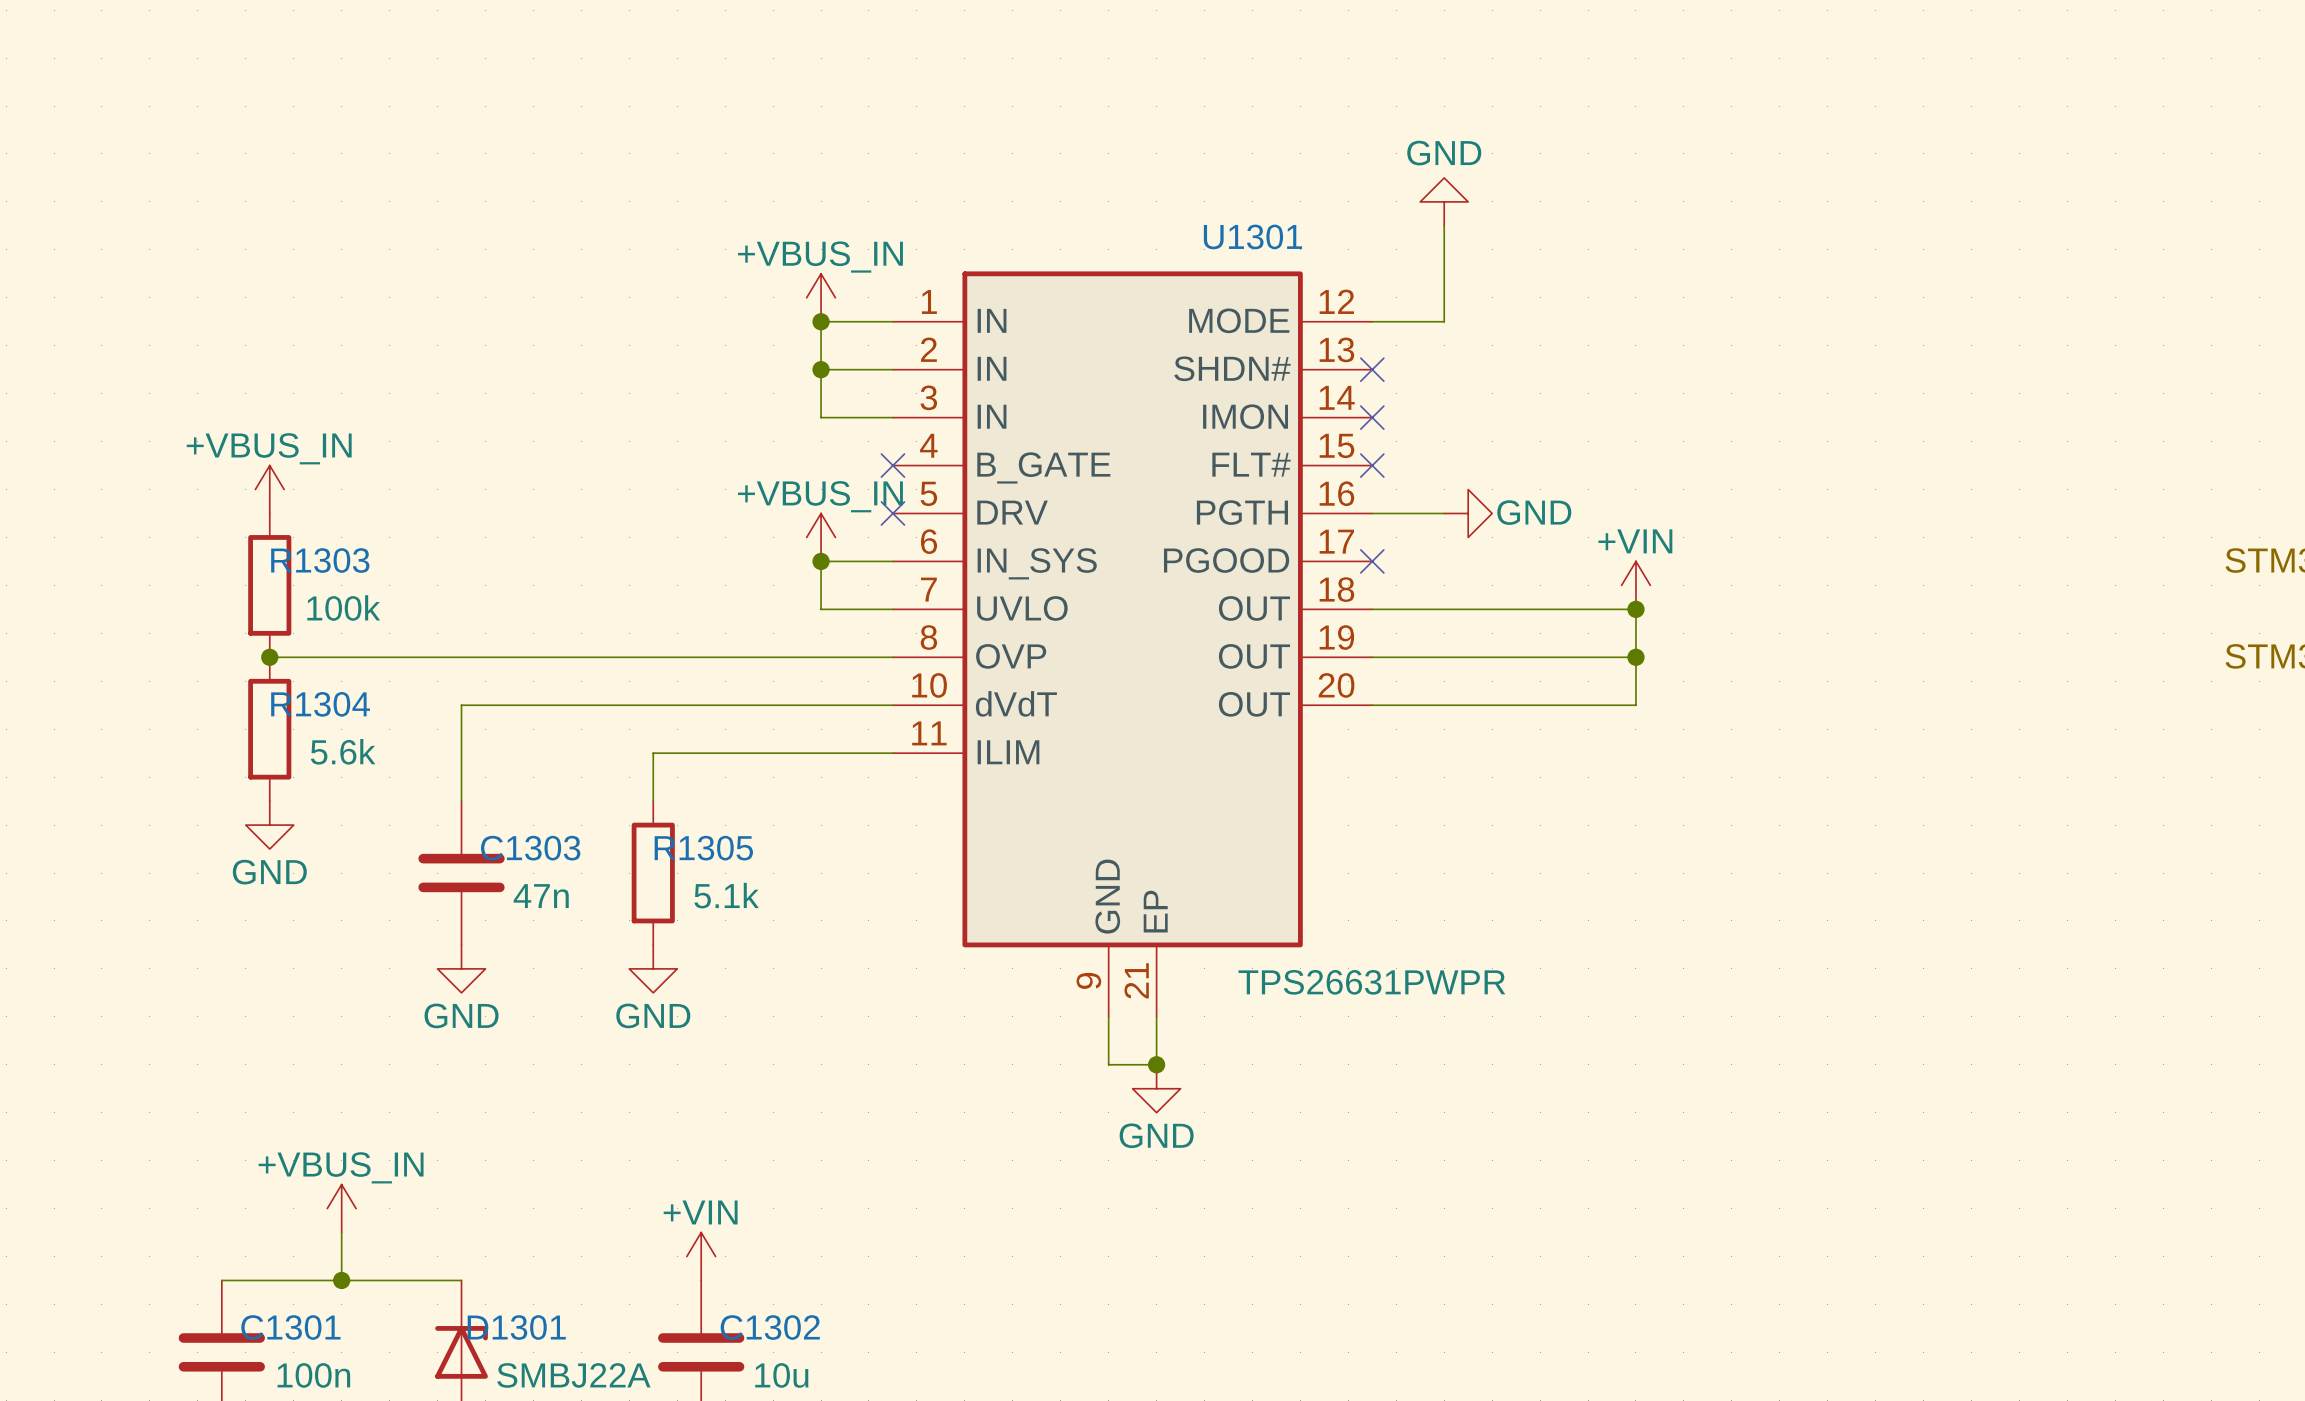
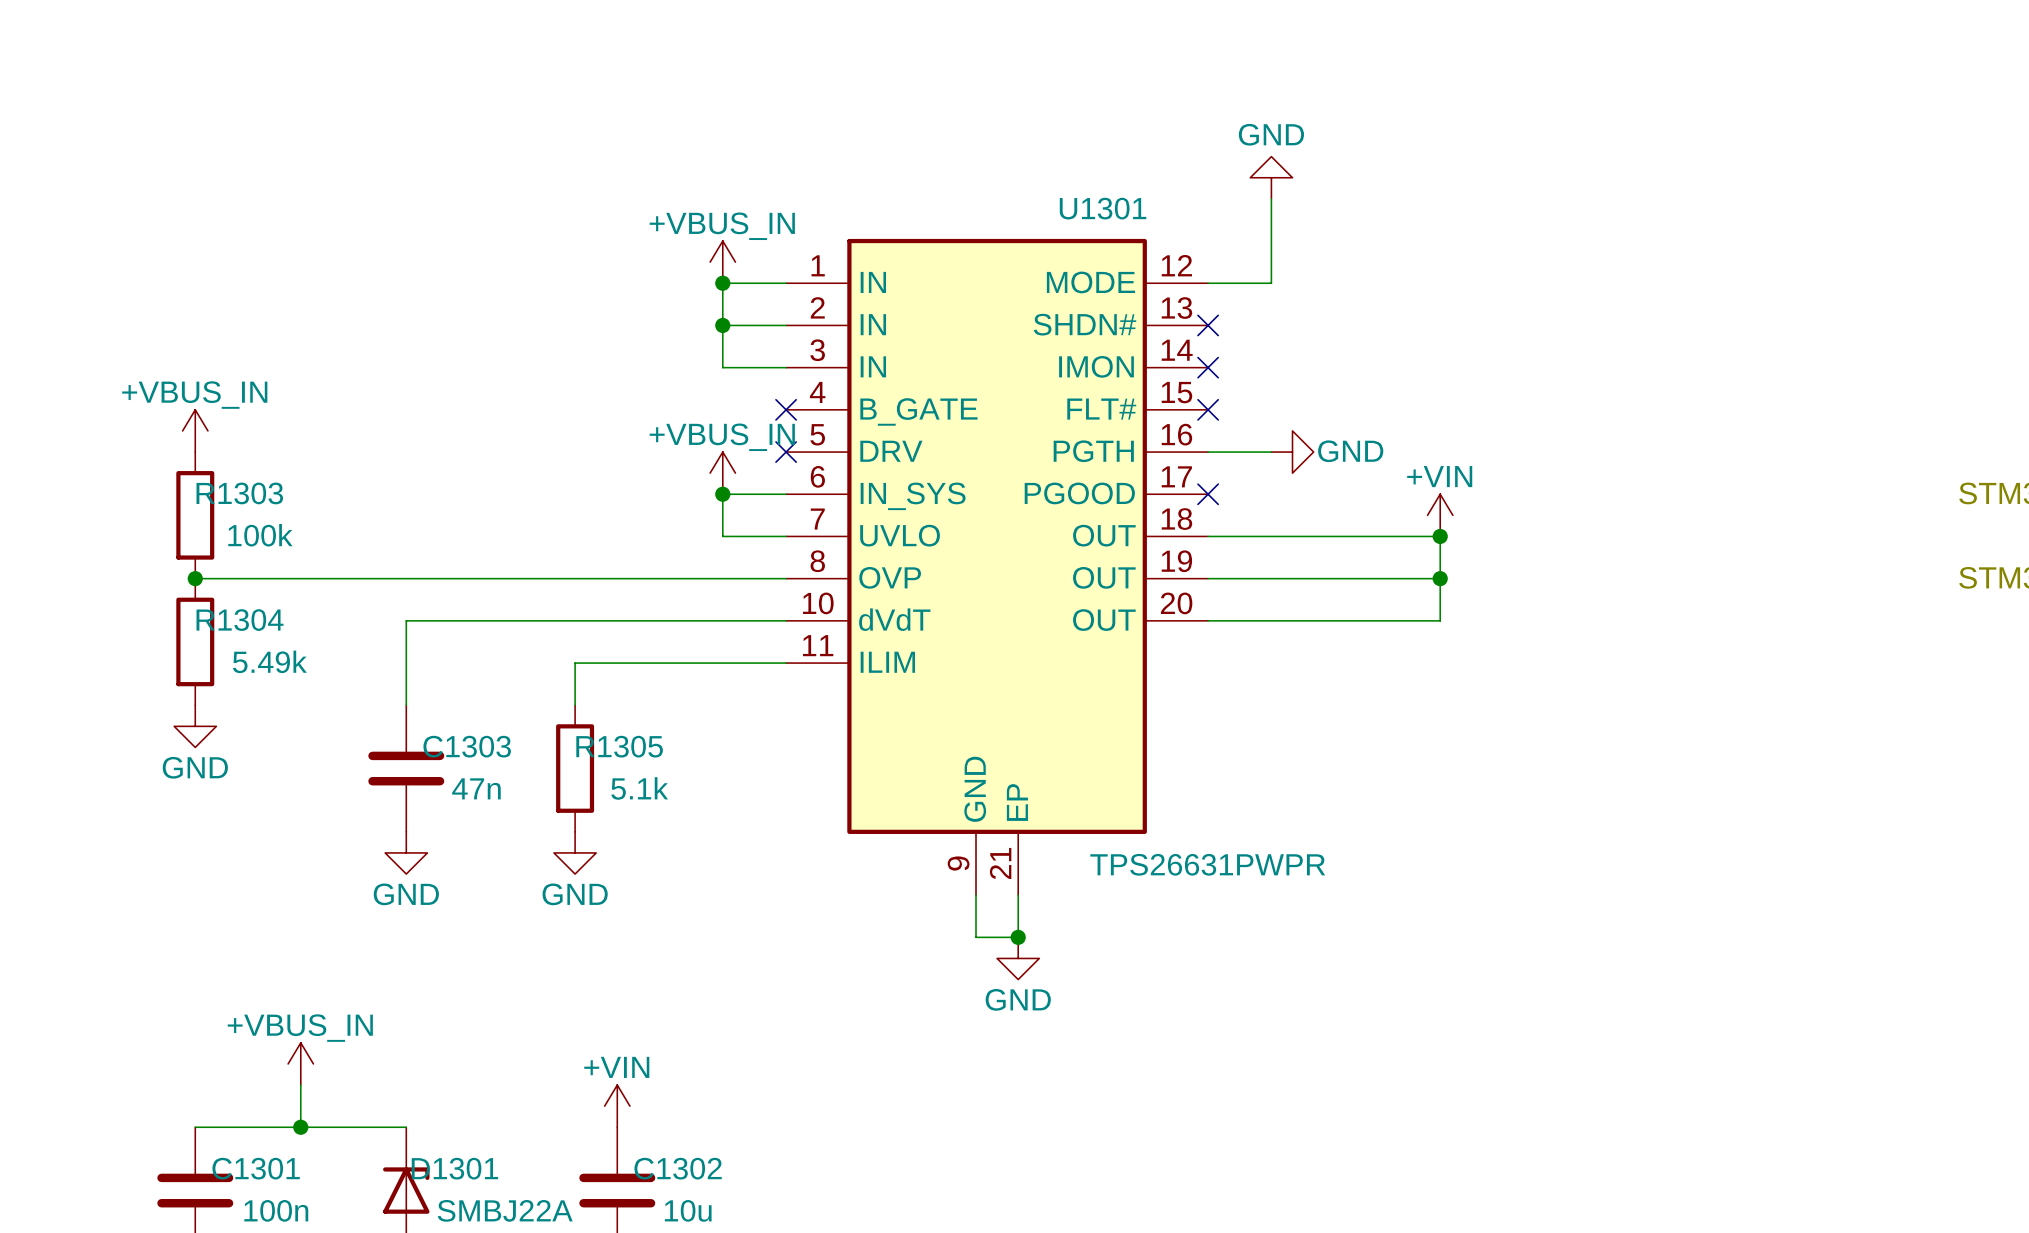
power symbol position: +VBUS_IN (269, 489) -> +VBUS_IN (195, 430)
R1303 position: (269, 585) -> (195, 515)
wire: none -> (195, 578) (237, 578)
junction position: (269, 657) -> (195, 578)
R1304 position: (269, 729) -> (195, 641)
R1304 value: 5.6k (343, 751) -> 5.49k (269, 661)
power symbol position: GND (269, 825) -> GND (195, 726)

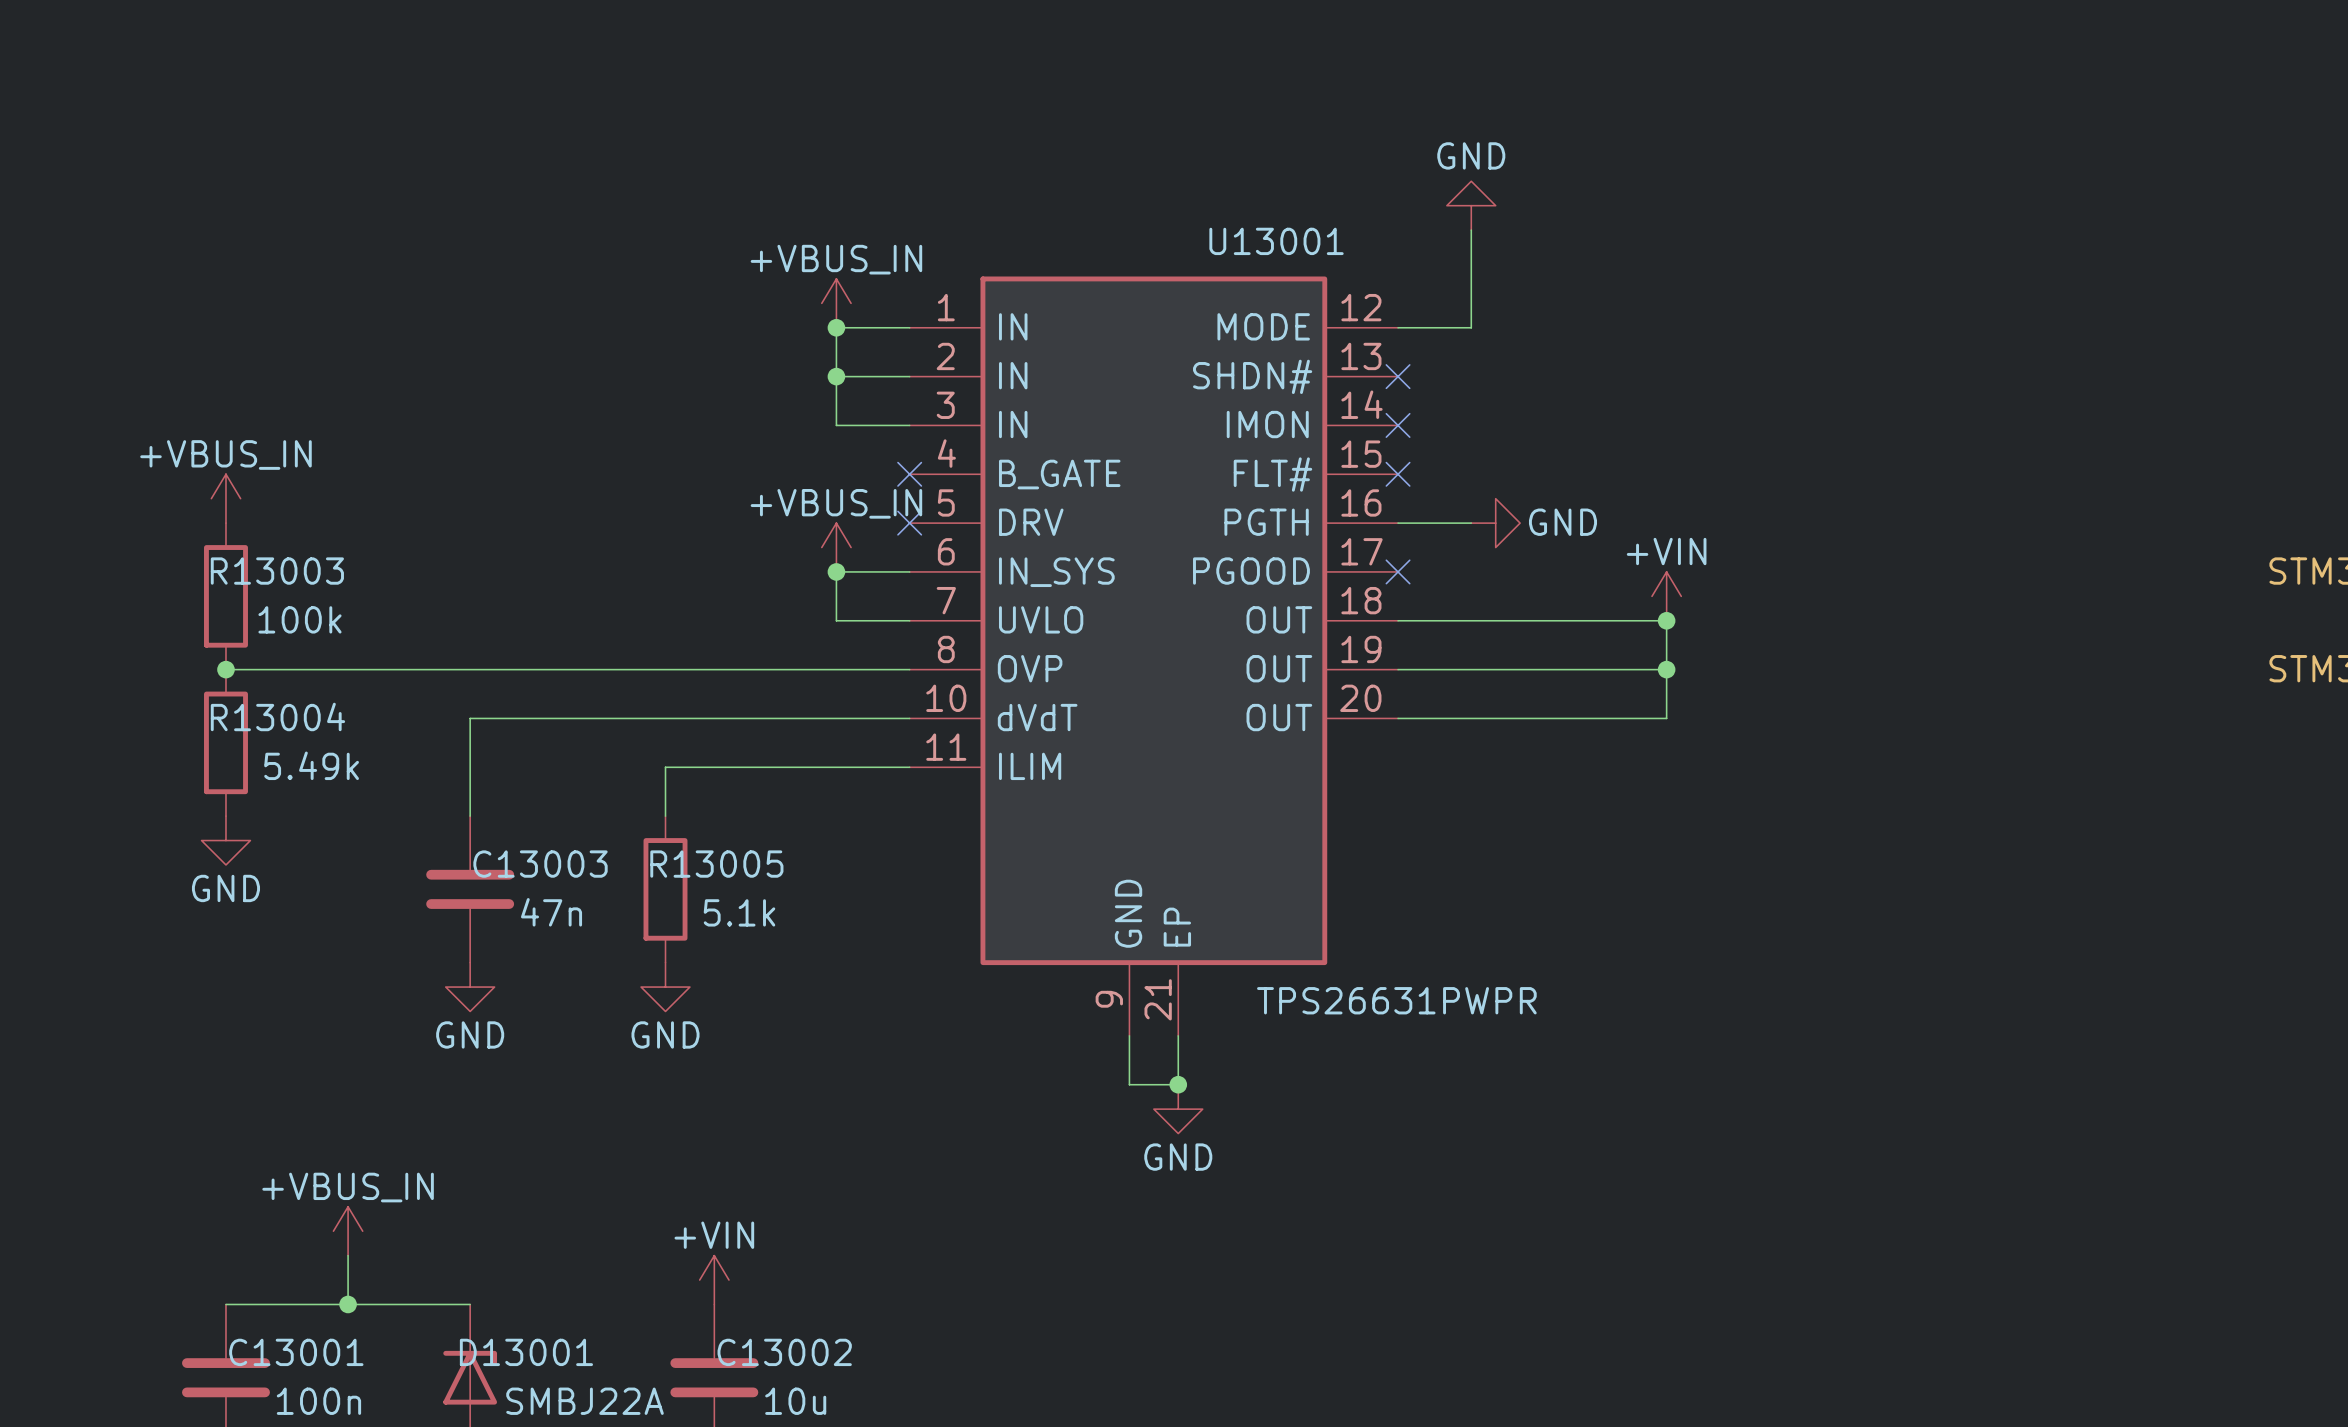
U1301 name: U1301 (1103, 208) -> U13001 (1276, 241)
R1303 name: R1303 (239, 493) -> R13003 (277, 571)
R1304 name: R1304 (240, 620) -> R13004 (277, 716)
C1303 name: C1303 (467, 746) -> C13003 (540, 864)
R1305 name: R1305 (619, 746) -> R13005 (716, 864)
C1301 name: C1301 (256, 1168) -> C13001 (296, 1352)
D1301 name: D1301 (454, 1168) -> D13001 (526, 1352)
C1302 name: C1302 (678, 1168) -> C13002 (784, 1352)

